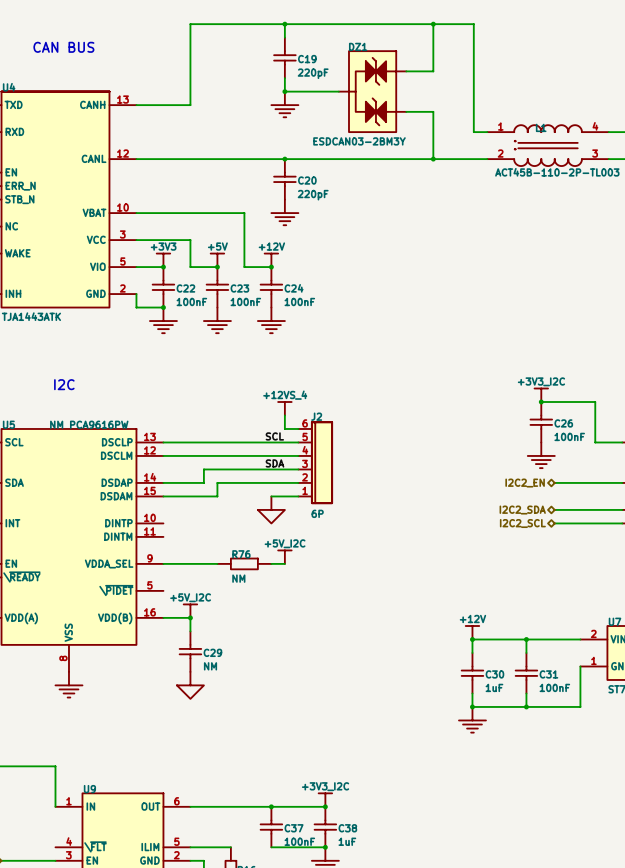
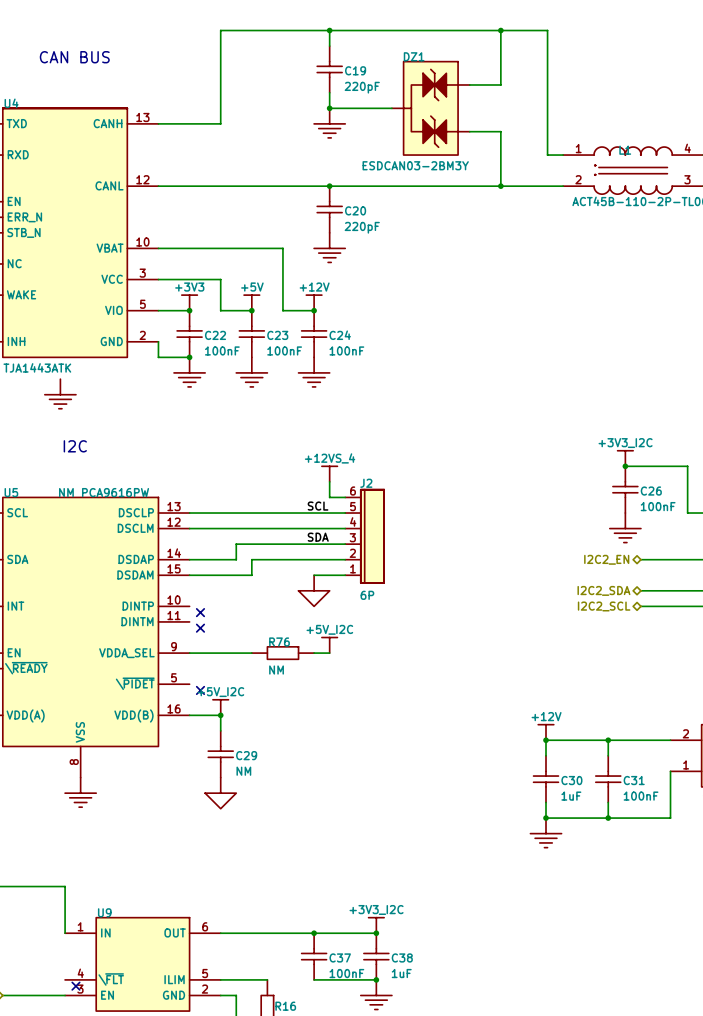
power symbol: none -> (60, 393)
no-connect mark: none -> (200, 612)
no-connect mark: none -> (200, 628)
no-connect mark: none -> (200, 690)
no-connect mark: none -> (75, 986)

